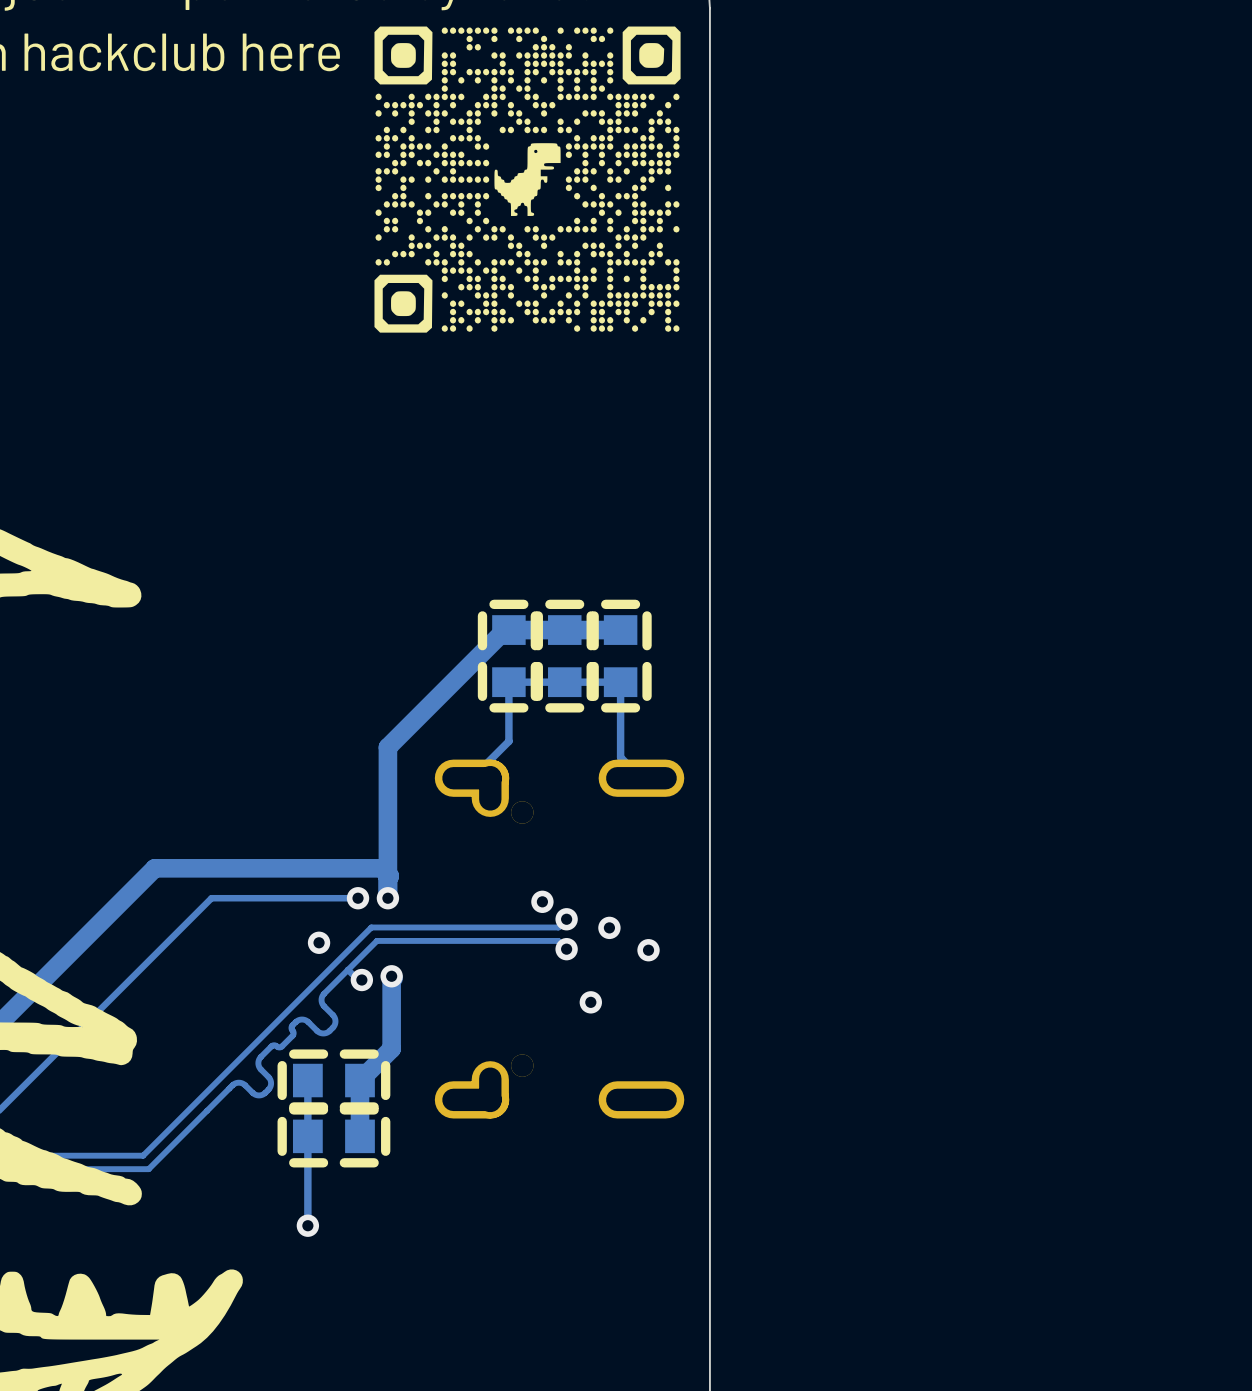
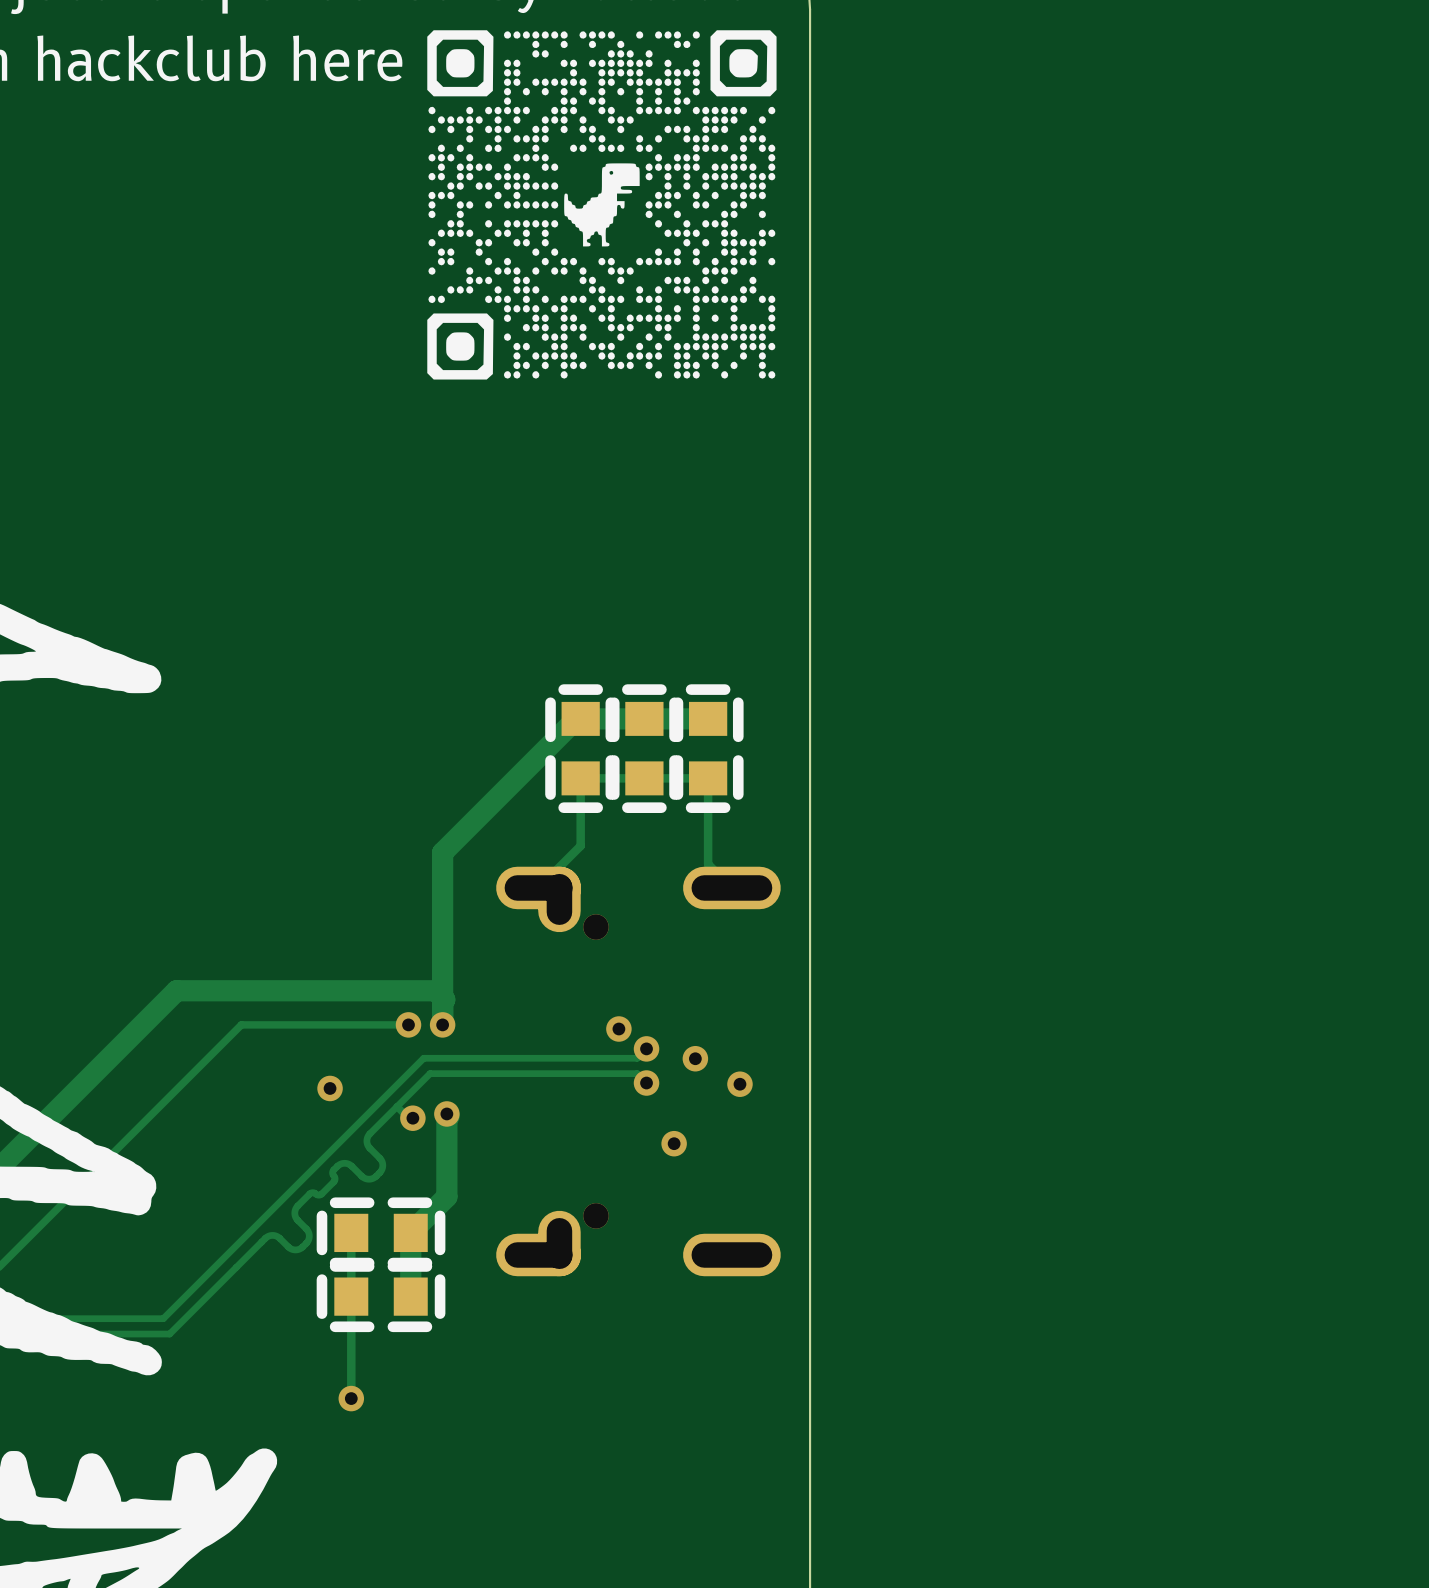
via position: (319, 942) -> (330, 1088)

